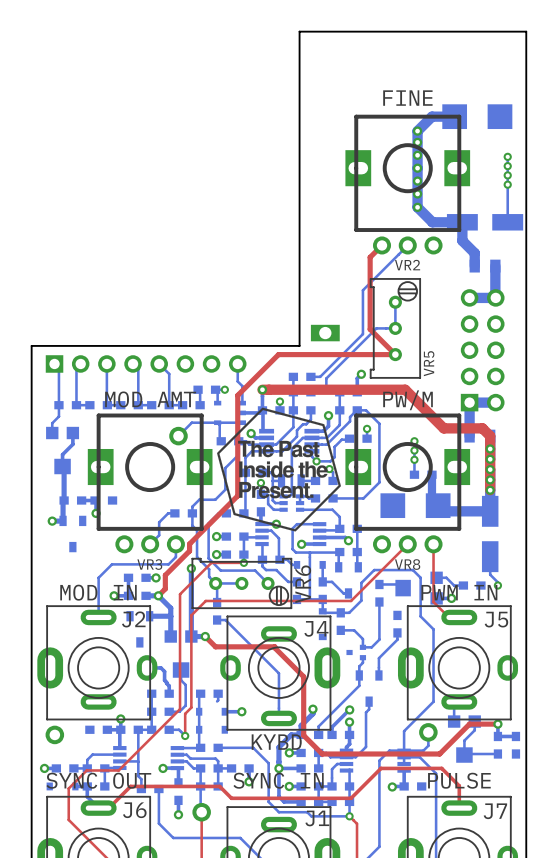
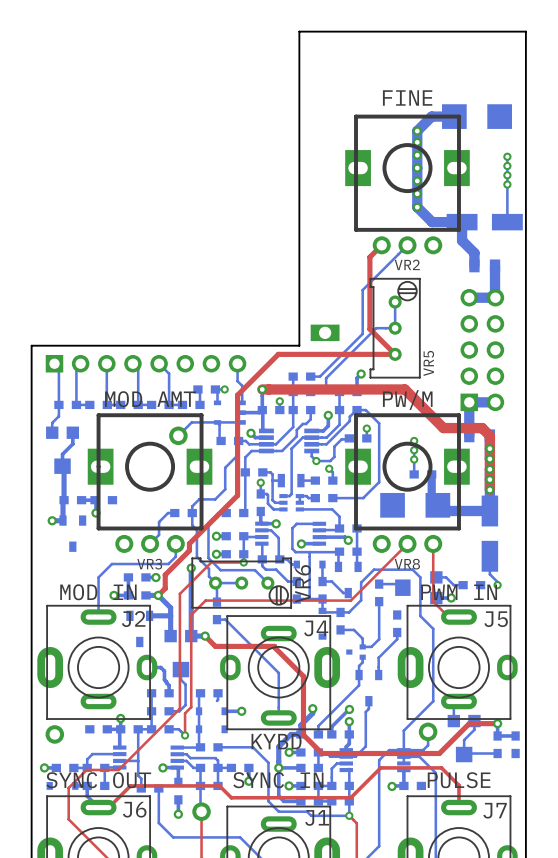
drawing: [217, 407, 341, 532] -> none

